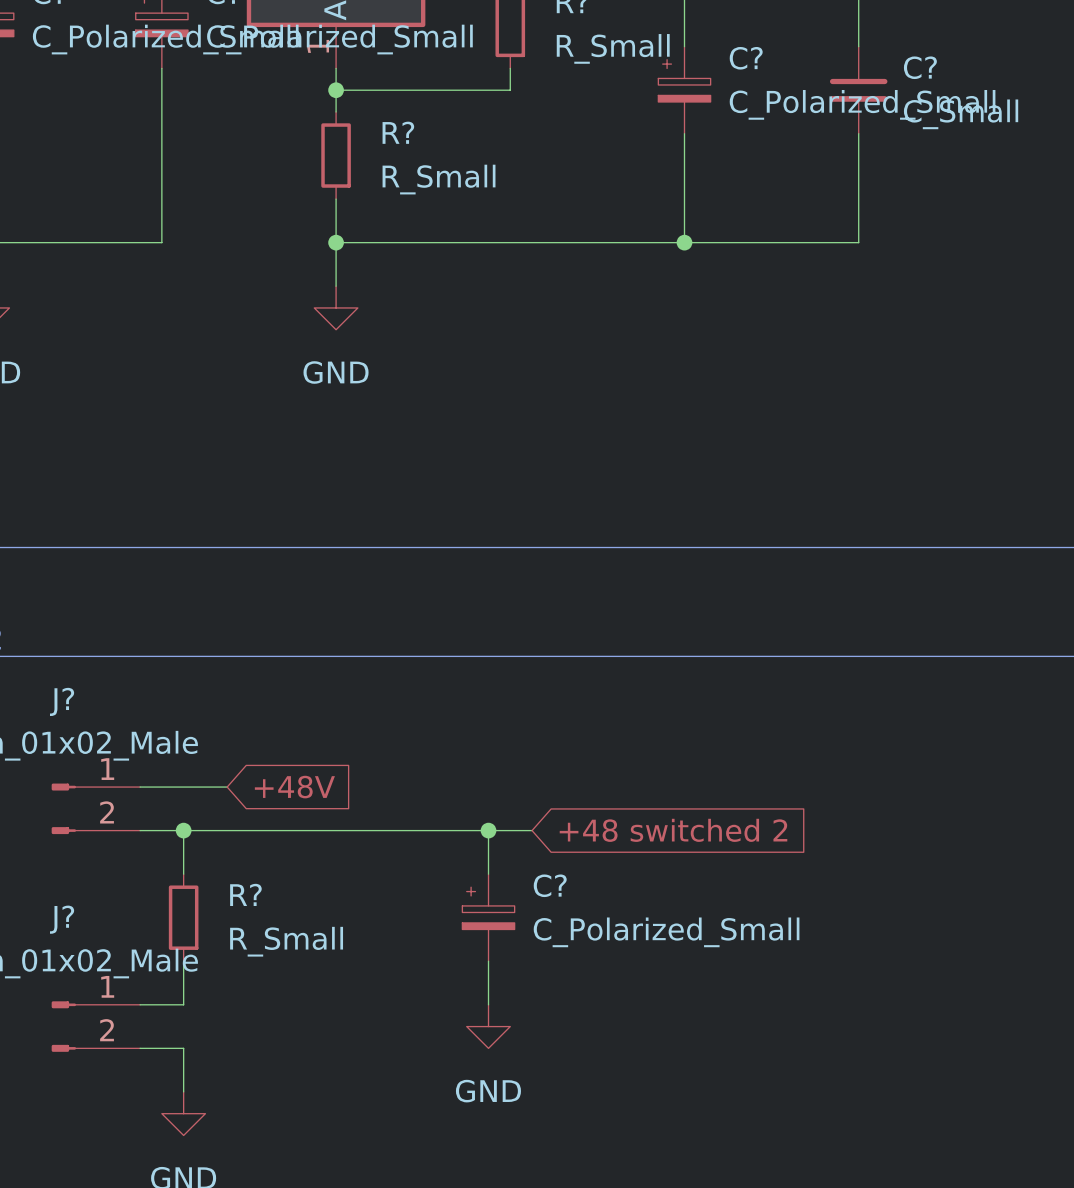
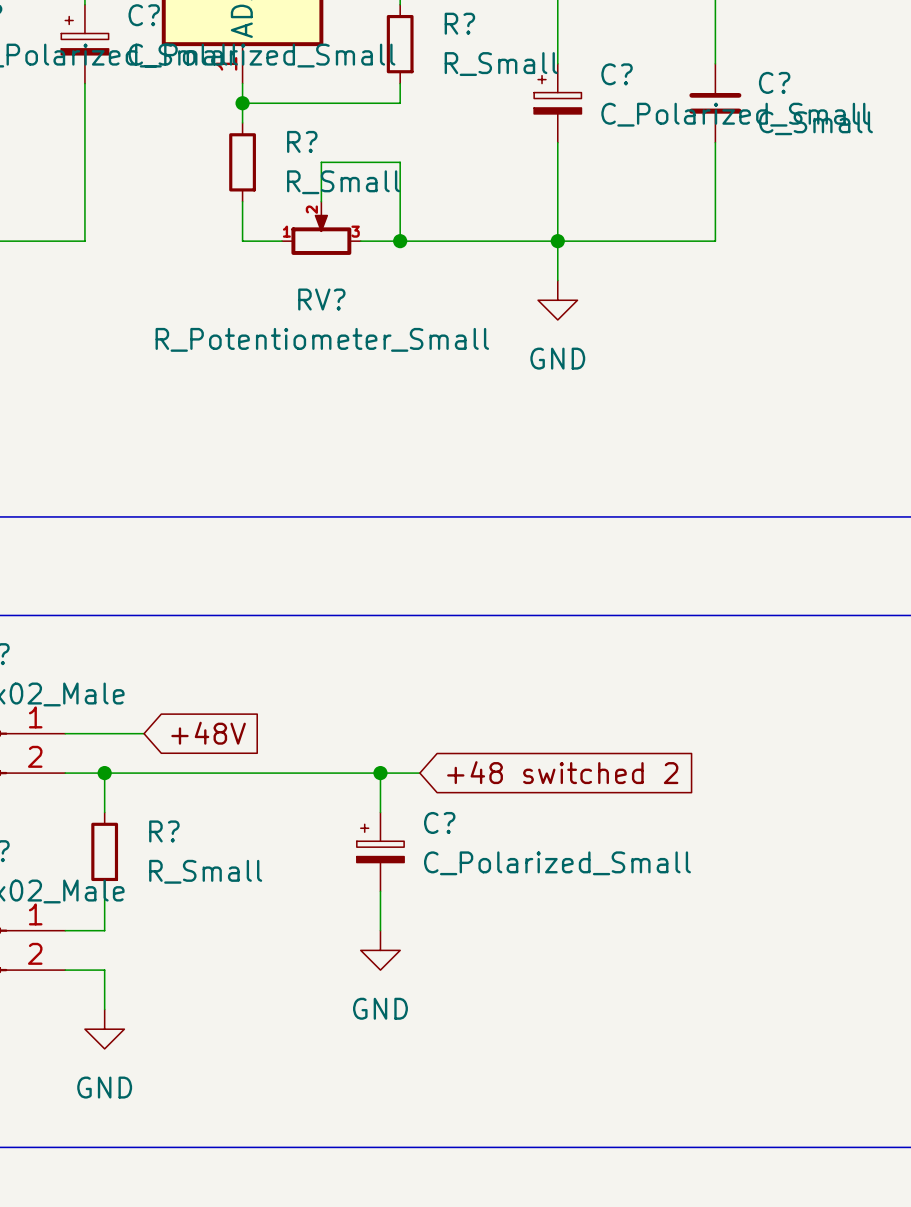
wire: none -> (321, 201) (321, 162) (400, 162) (400, 241)
RV?: none -> R_Potentiometer_Small (321, 228)
wire: (336, 242) (336, 286) -> (557, 241) (557, 280)
junction: (336, 242) -> none
wire: (379, 242) (466, 242) -> none
junction: none -> (400, 241)
power symbol position: GND (336, 307) -> GND (557, 300)

